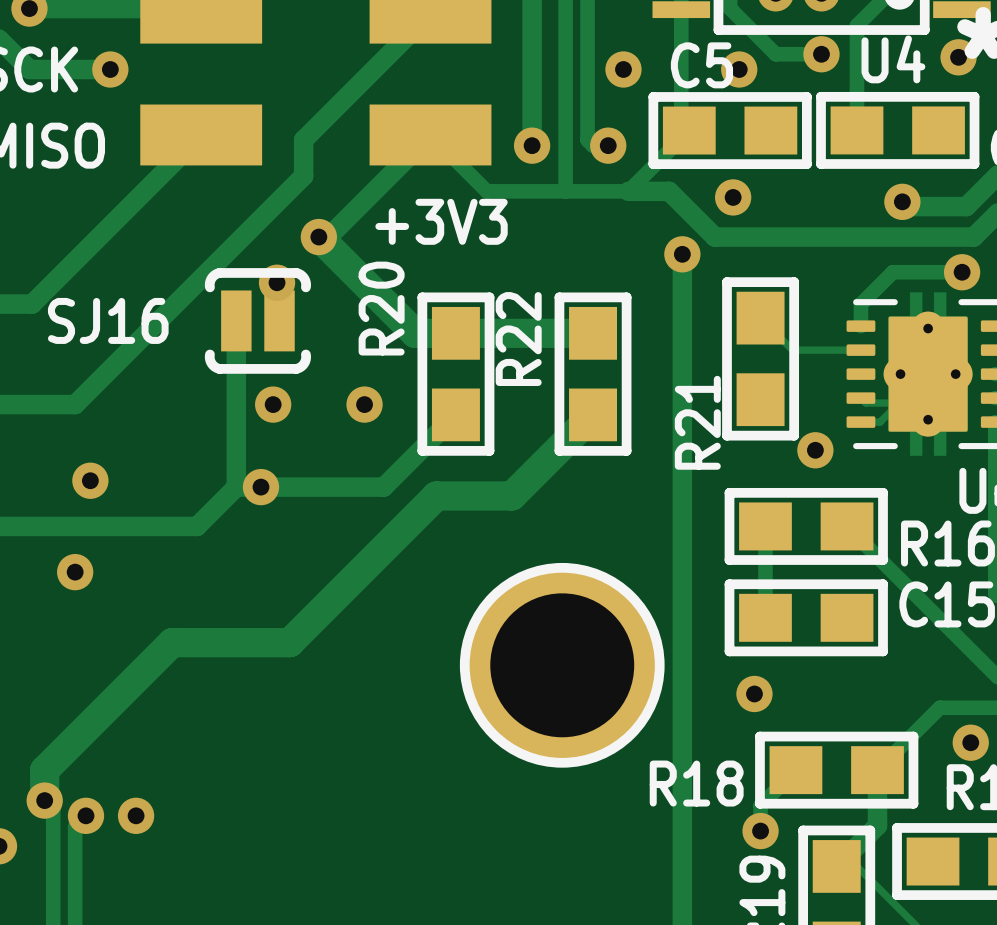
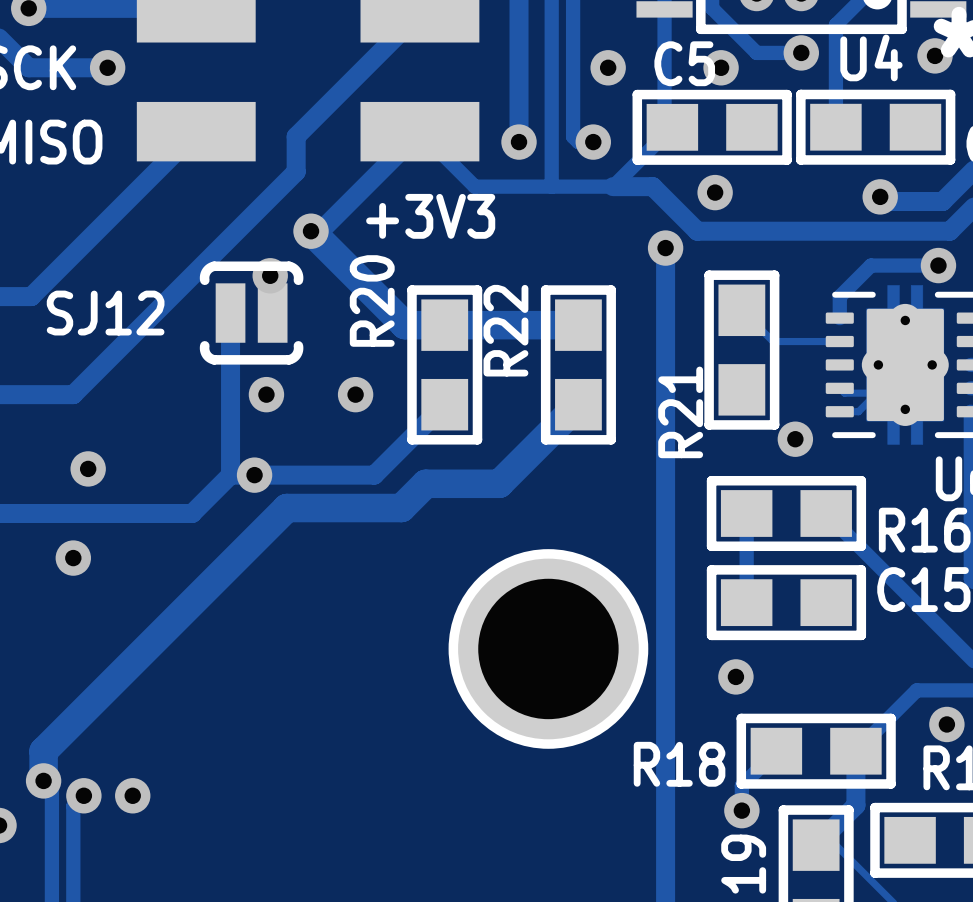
SJ16 name: SJ16 (108, 320) -> SJ12 (105, 313)
track: (411, 520) (289, 642) (172, 642) -> (401, 508) (286, 508) (167, 626)

